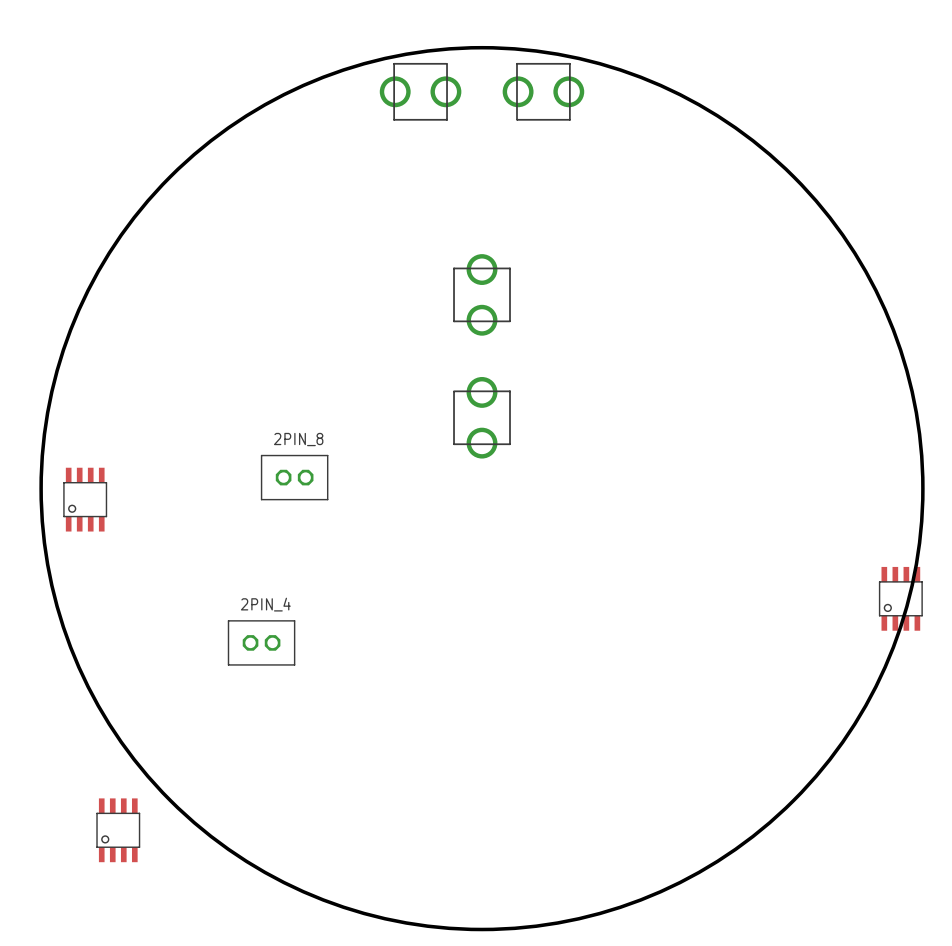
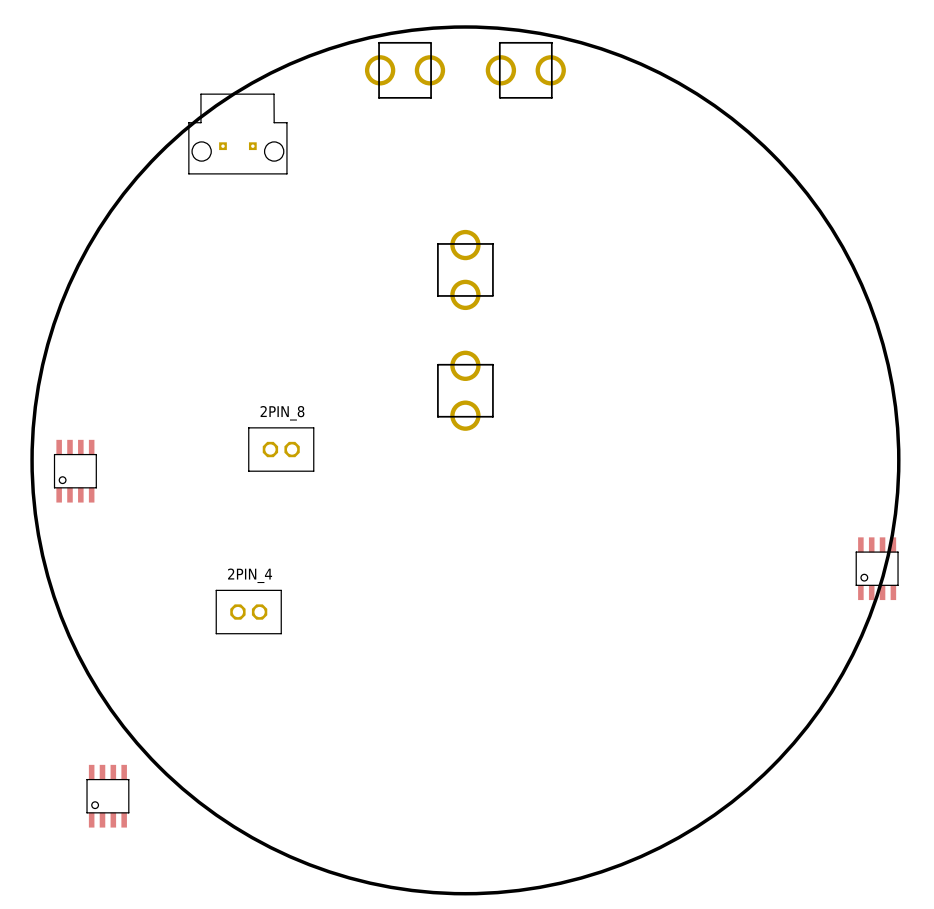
part: none -> (237, 134)

